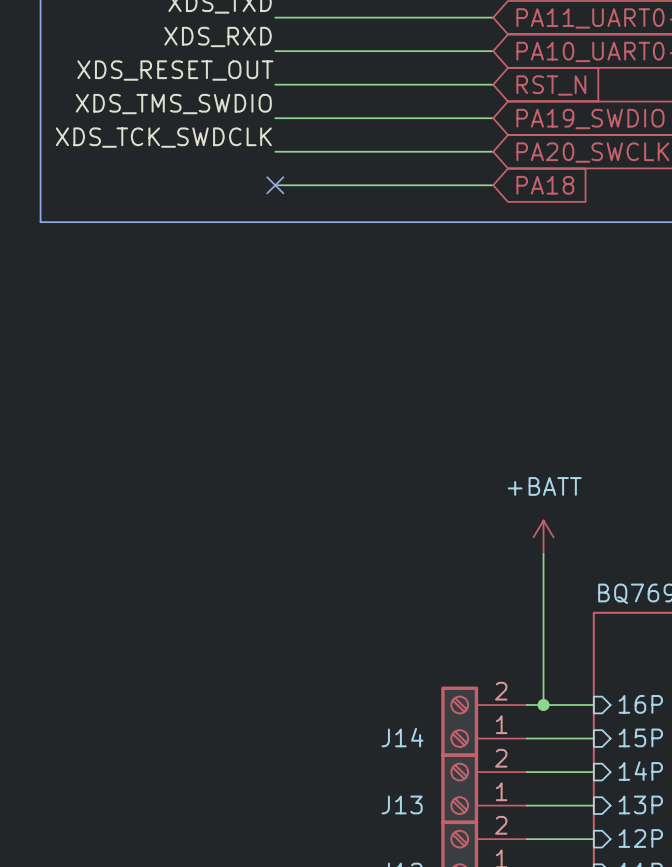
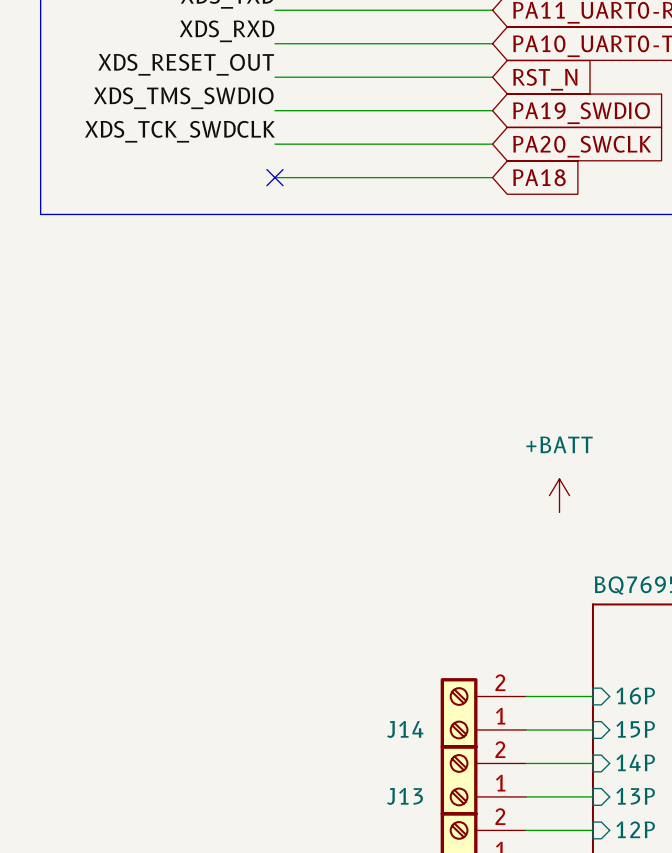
power symbol position: +BATT (543, 537) -> +BATT (559, 495)
wire: (543, 554) (543, 705) -> none
junction: (543, 705) -> none

